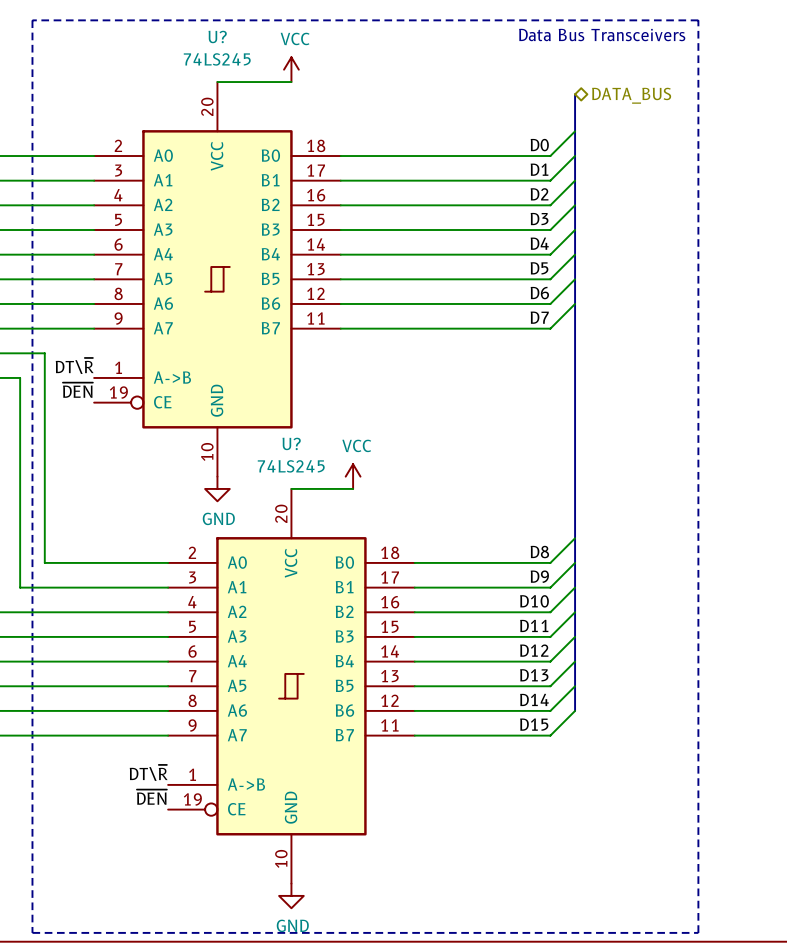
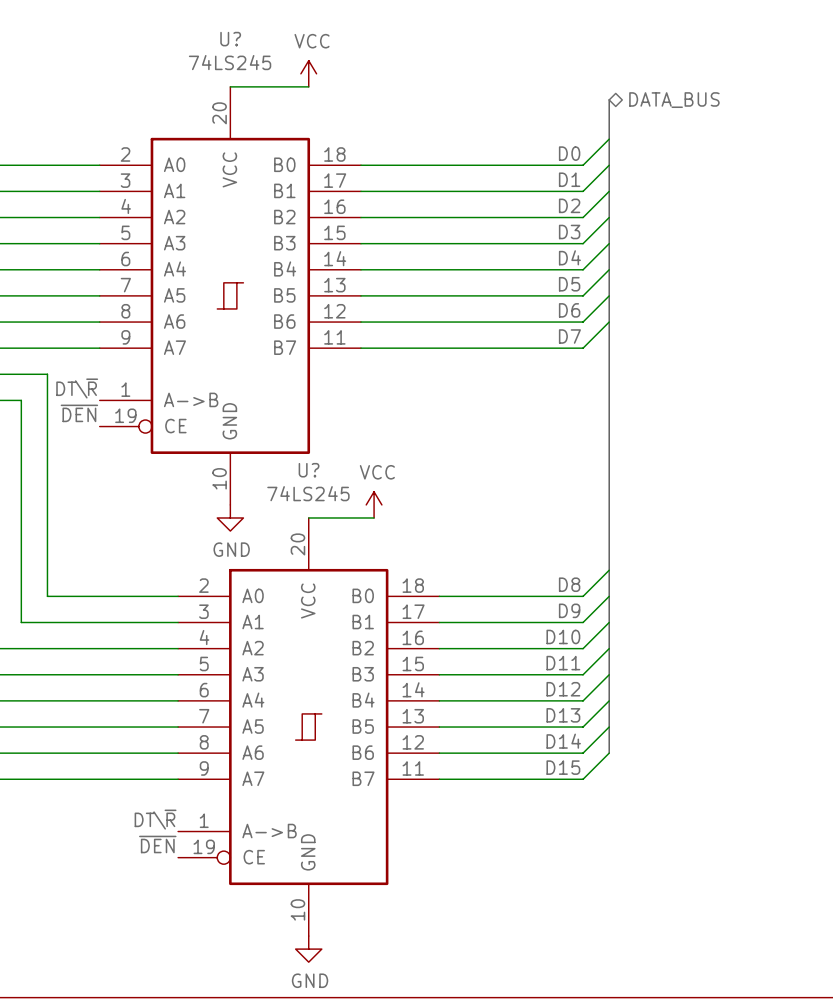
line: (32, 20) (698, 20) (698, 932) (32, 932) (32, 20) -> none
text: Data Bus Transceivers (602, 35) -> none

